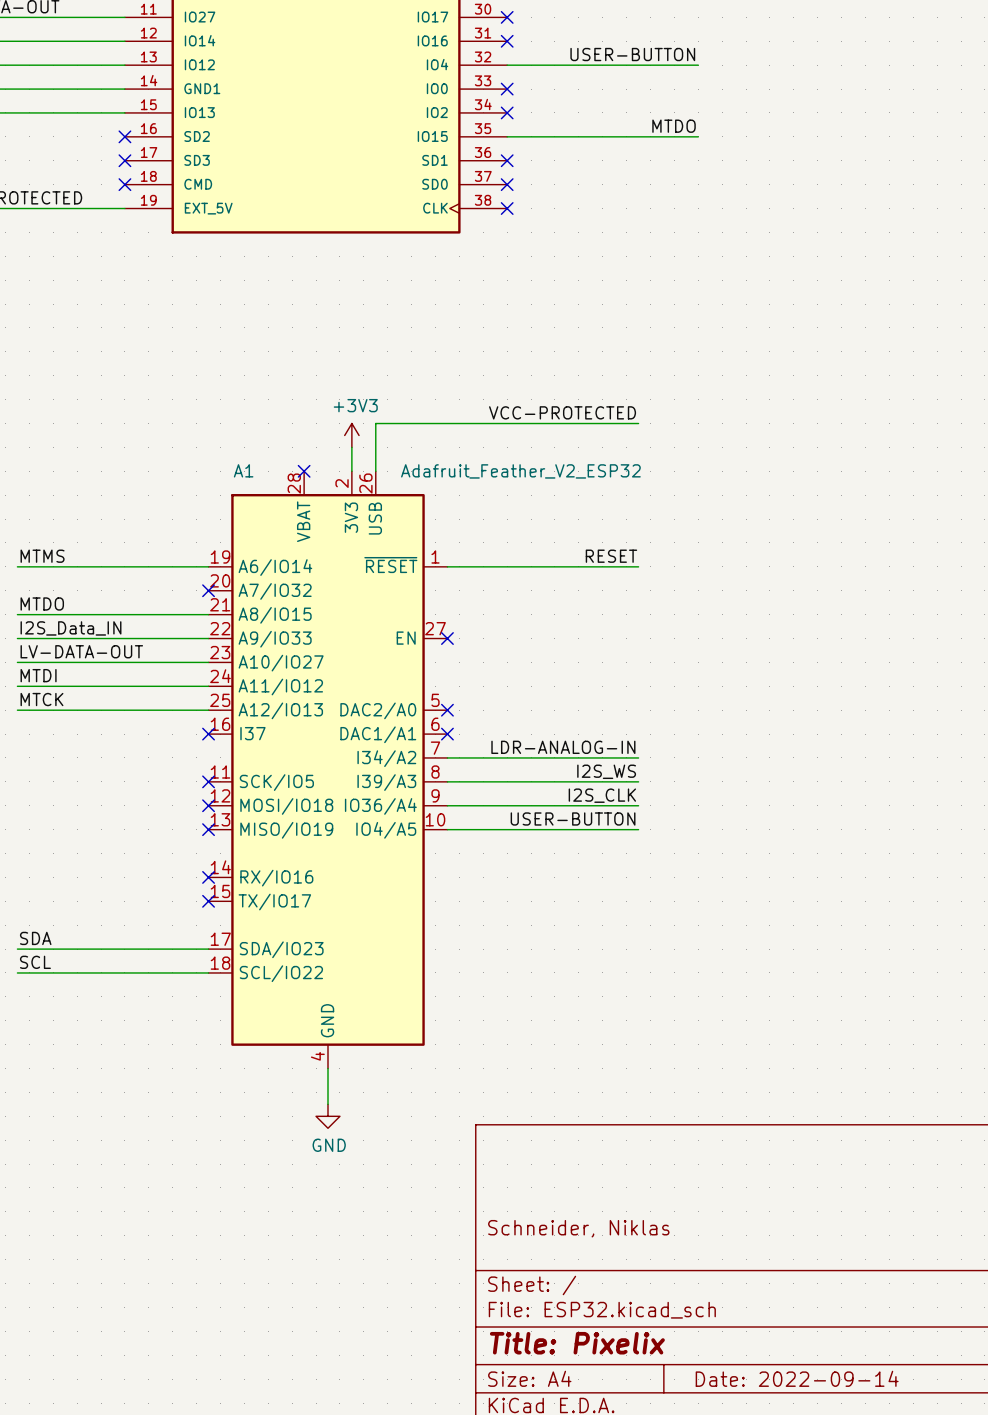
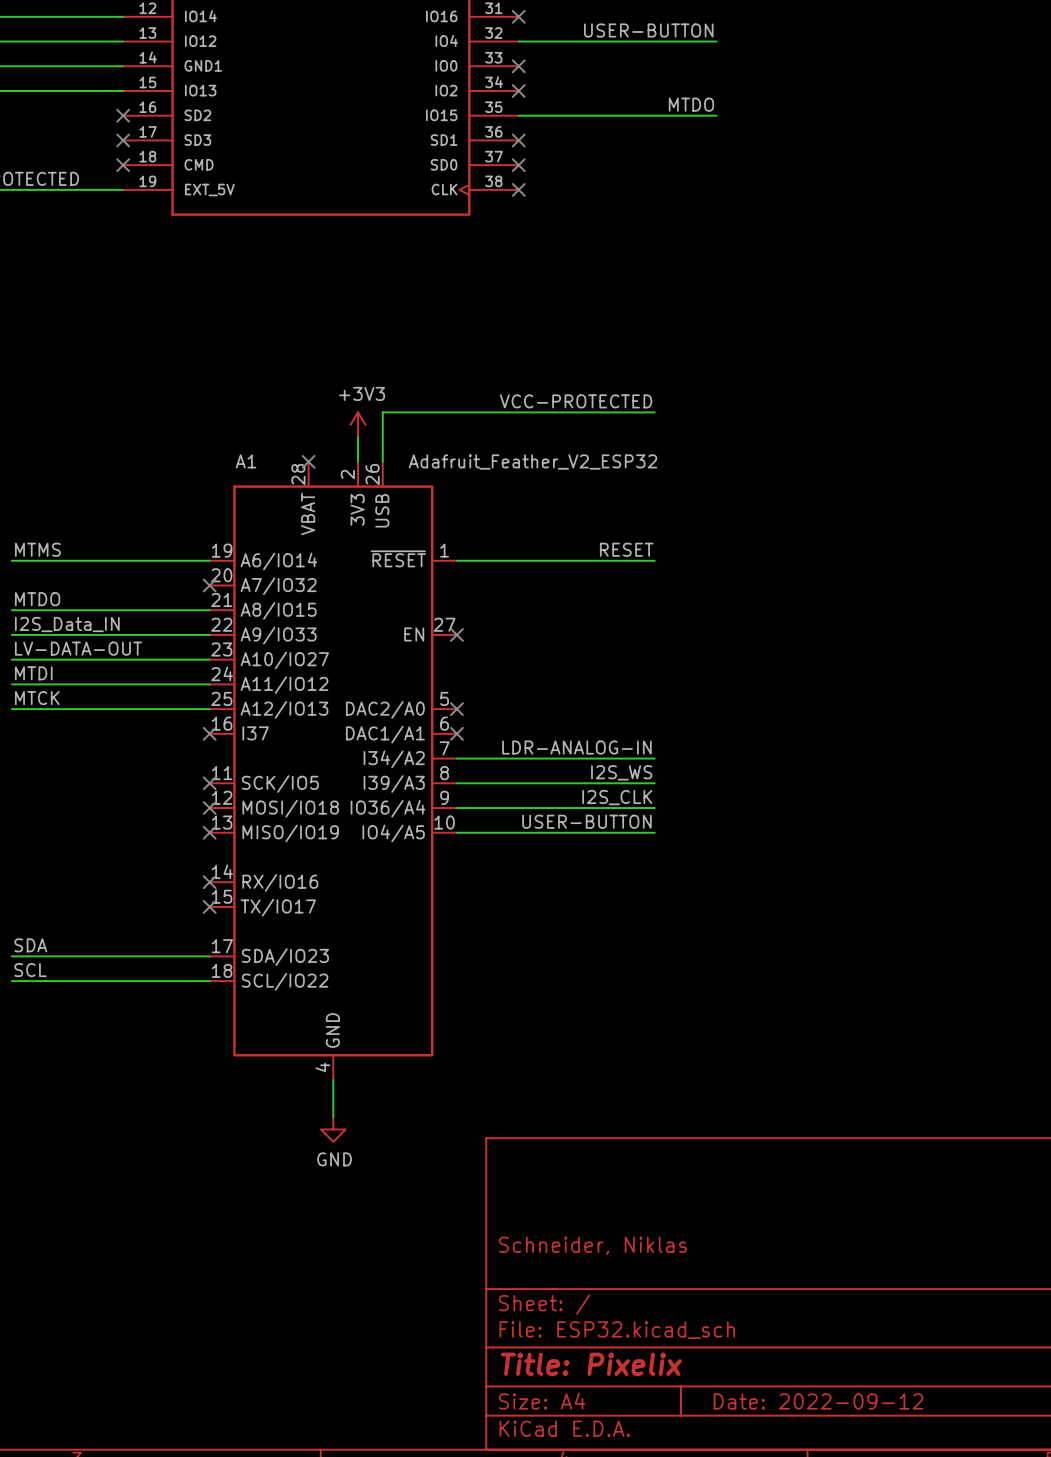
title block: Date: 2022-09-14 (797, 1378) -> Date: 2022-09-12 (818, 1401)

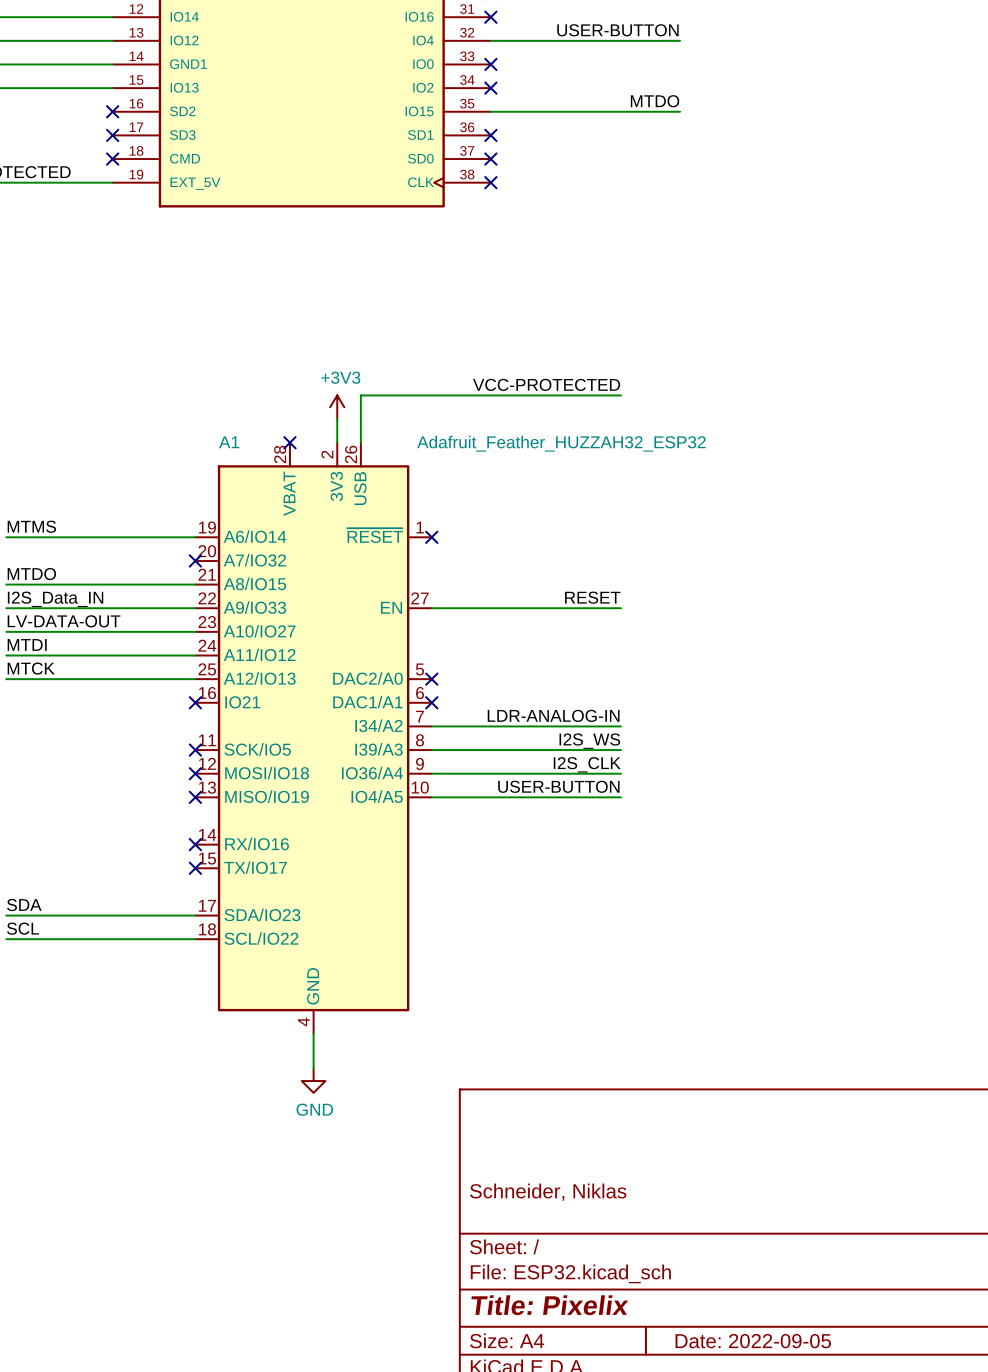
A1 value: Adafruit_Feather_V2_ESP32 (532, 461) -> Adafruit_Feather_HUZZAH32_ESP32 (561, 443)
label position: RESET (626, 549) -> RESET (592, 597)
wire: (456, 560) (654, 560) -> (431, 608) (620, 608)
no-connect mark: none -> (431, 537)
no-connect mark: (456, 634) -> none
A1 pin name: I37 (255, 733) -> IO21 (242, 702)
title block: Date: 2022-09-12 (818, 1401) -> Date: 2022-09-05 (753, 1341)

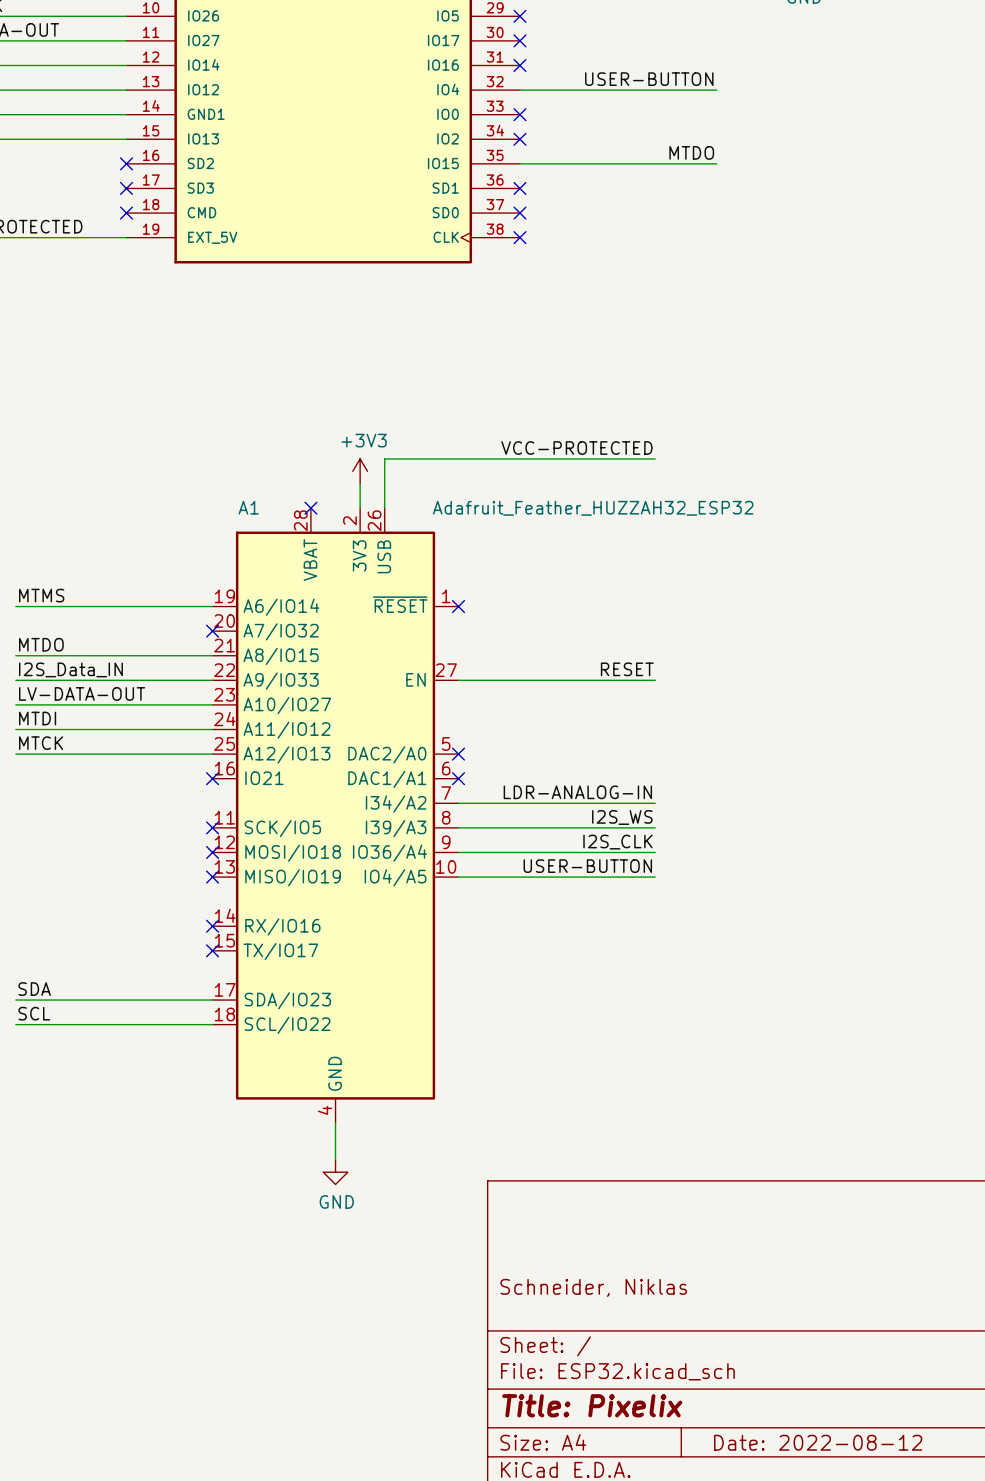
title block: Date: 2022-09-05 (753, 1341) -> Date: 2022-08-12 (818, 1442)

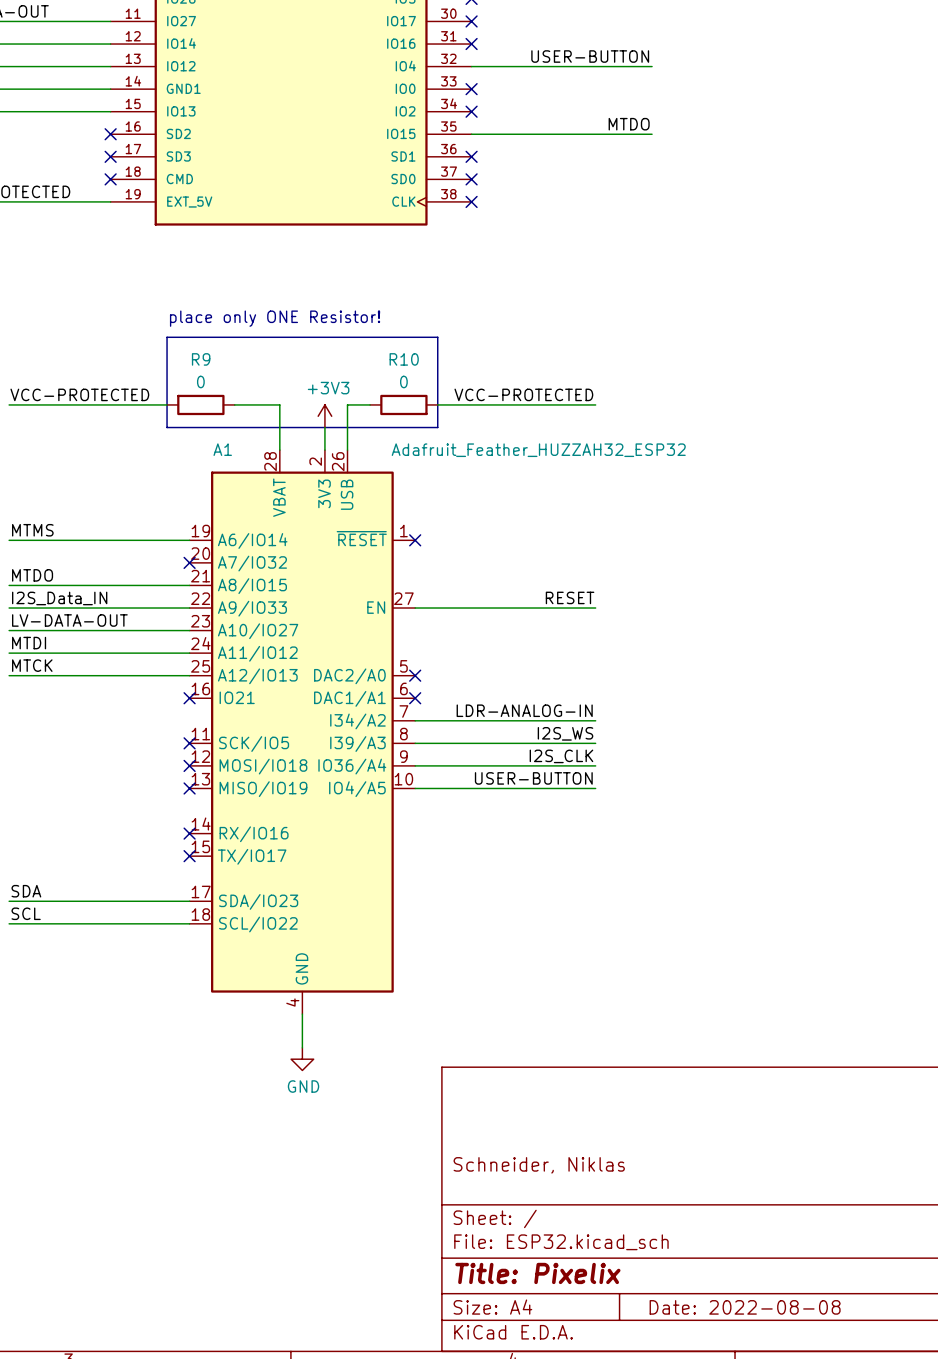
text: none -> place only ONE Resistor! (275, 318)
line: none -> (167, 337) (167, 427) (437, 427) (437, 337) (167, 337)
label: none -> VCC-PROTECTED (79, 394)
wire: none -> (9, 404) (167, 404)
R9: none -> 0 (200, 404)
wire: none -> (234, 404) (279, 404) (279, 450)
wire: (409, 458) (483, 458) -> none
R10: none -> 0 (403, 404)
no-connect mark: (310, 508) -> none
title block: Date: 2022-08-12 (818, 1442) -> Date: 2022-08-08 (745, 1307)

